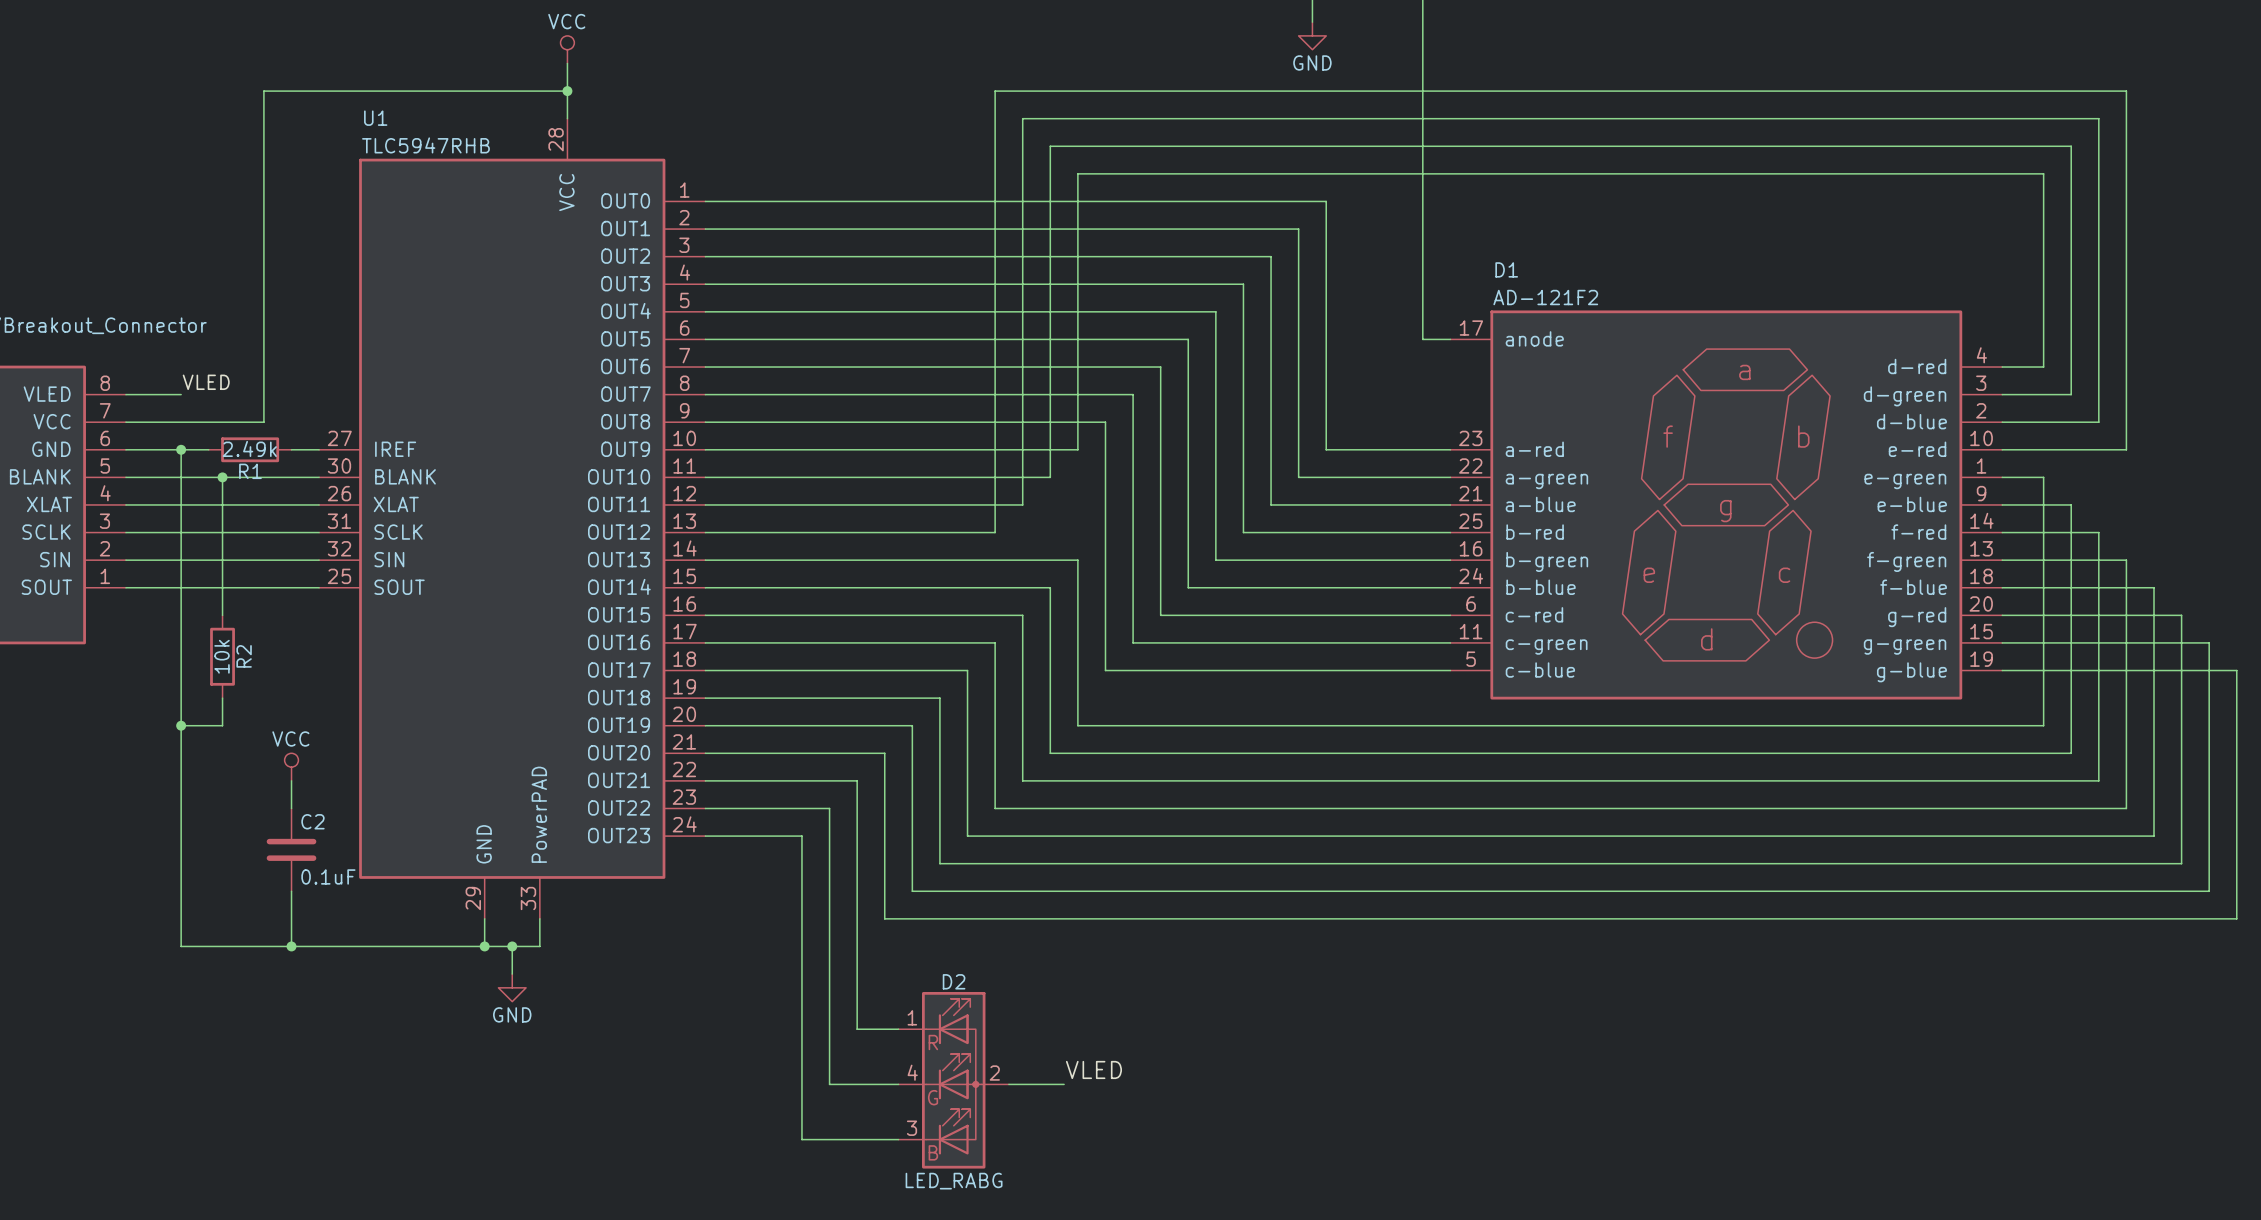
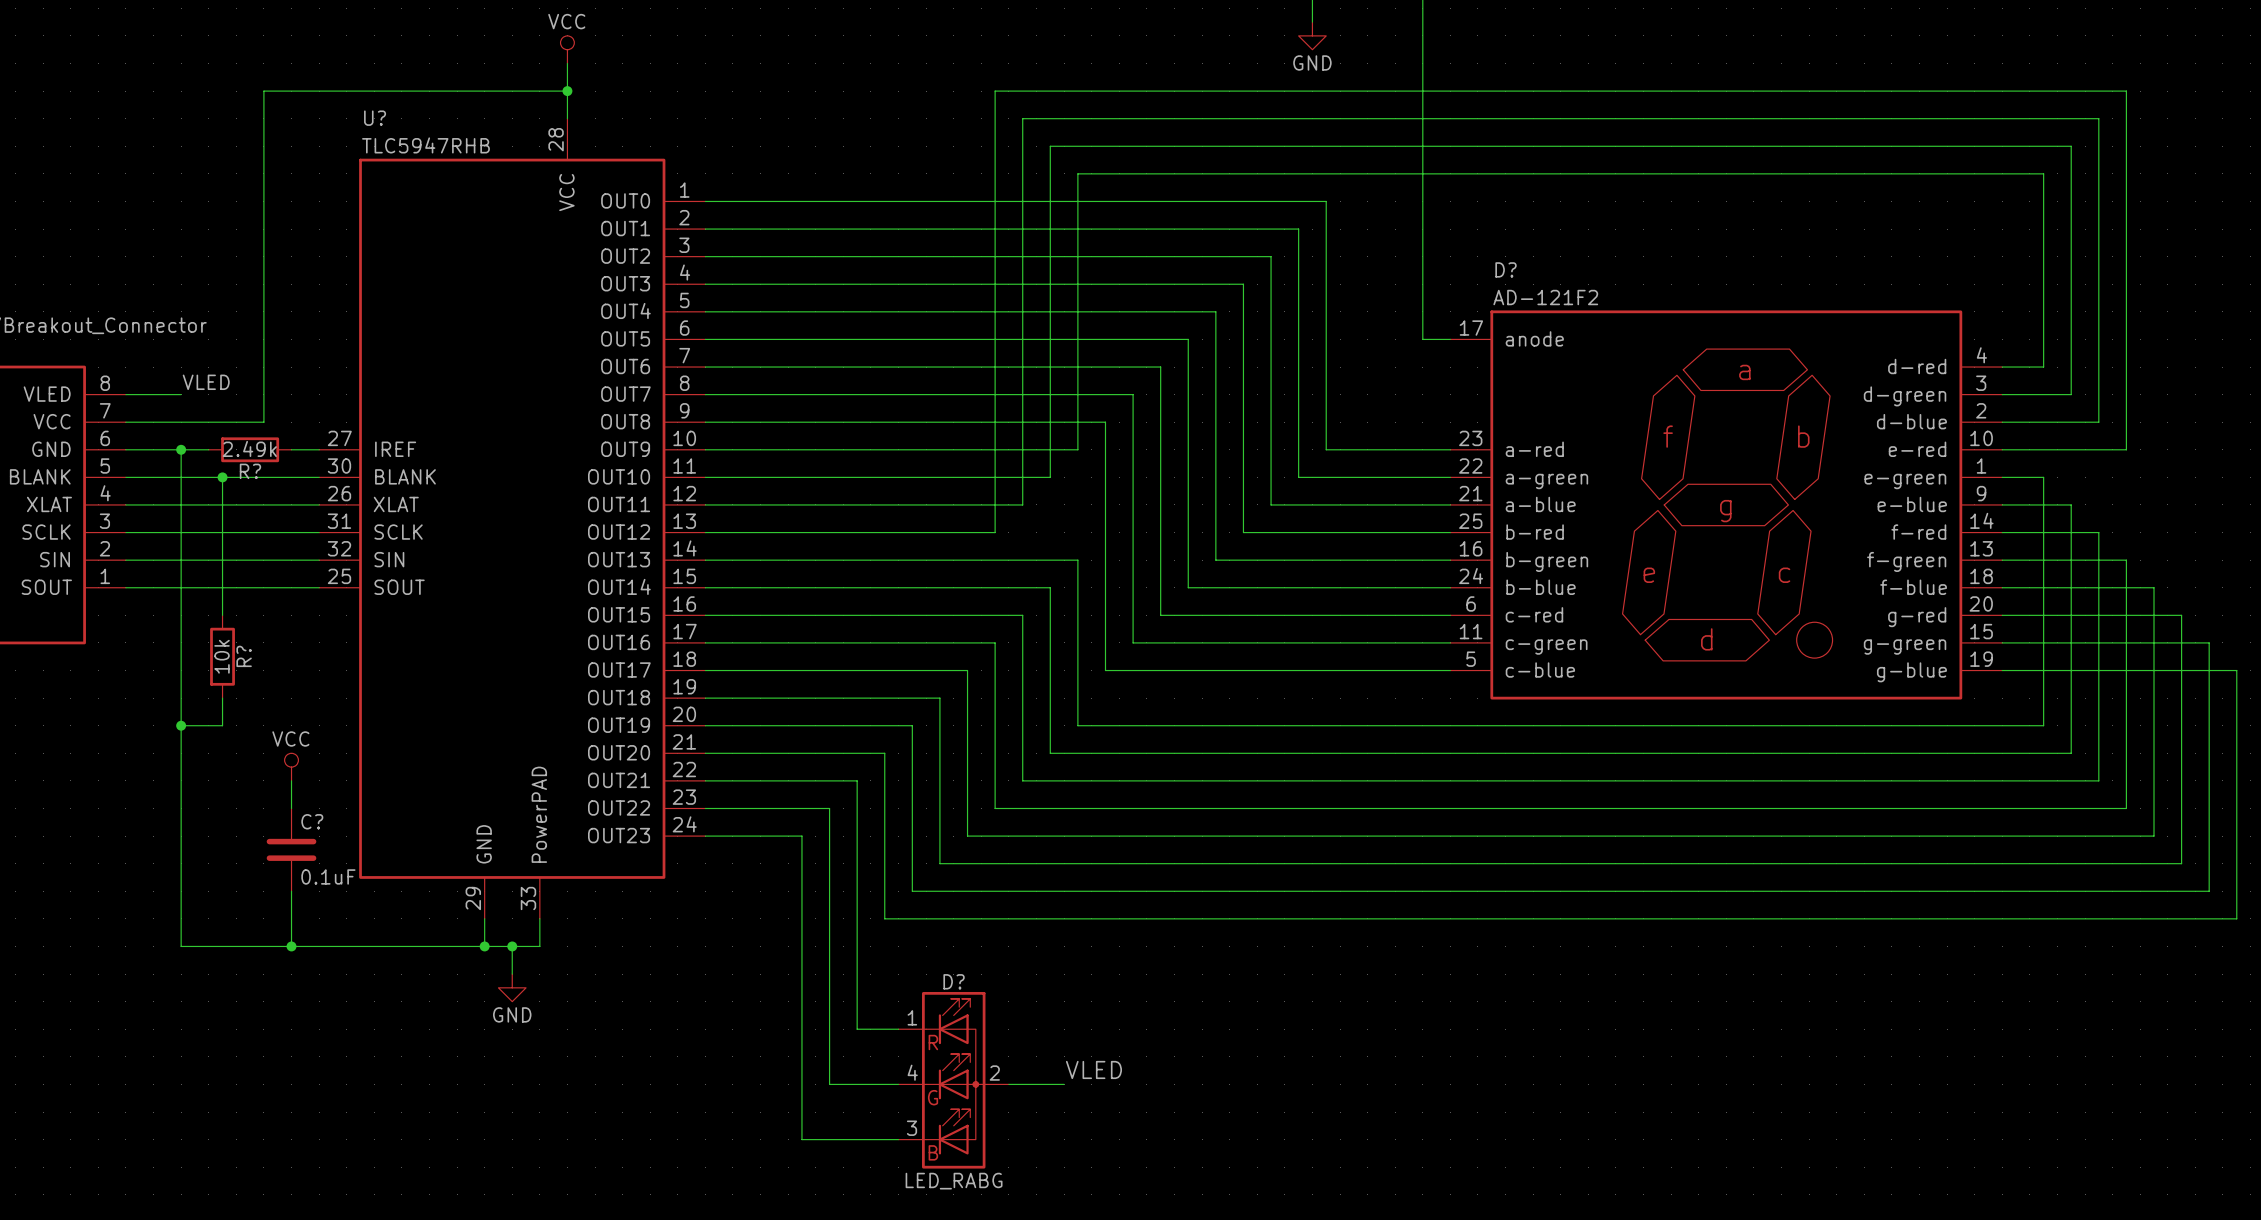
U1 name: U1 (375, 118) -> U? (375, 118)
D1 name: D1 (1506, 269) -> D? (1506, 269)
R1 name: R1 (250, 471) -> R? (250, 471)
R2 name: R2 (244, 656) -> R? (244, 656)
C2 name: C2 (312, 821) -> C? (312, 821)
D2 name: D2 (954, 981) -> D? (954, 981)

